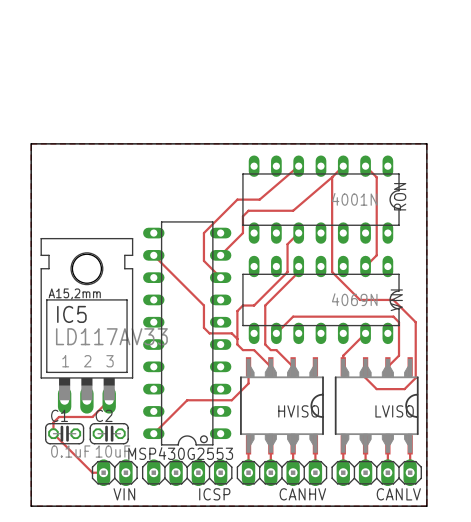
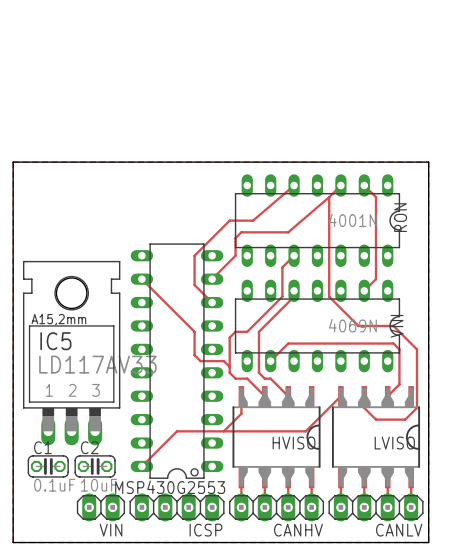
track: (365, 333) (343, 355) (343, 361) -> none
track: none -> (340, 396) (305, 431) (223, 431)
track: (109, 400) (92, 416) (59, 416) (53, 422) (53, 433) (92, 472) (103, 472) -> none

